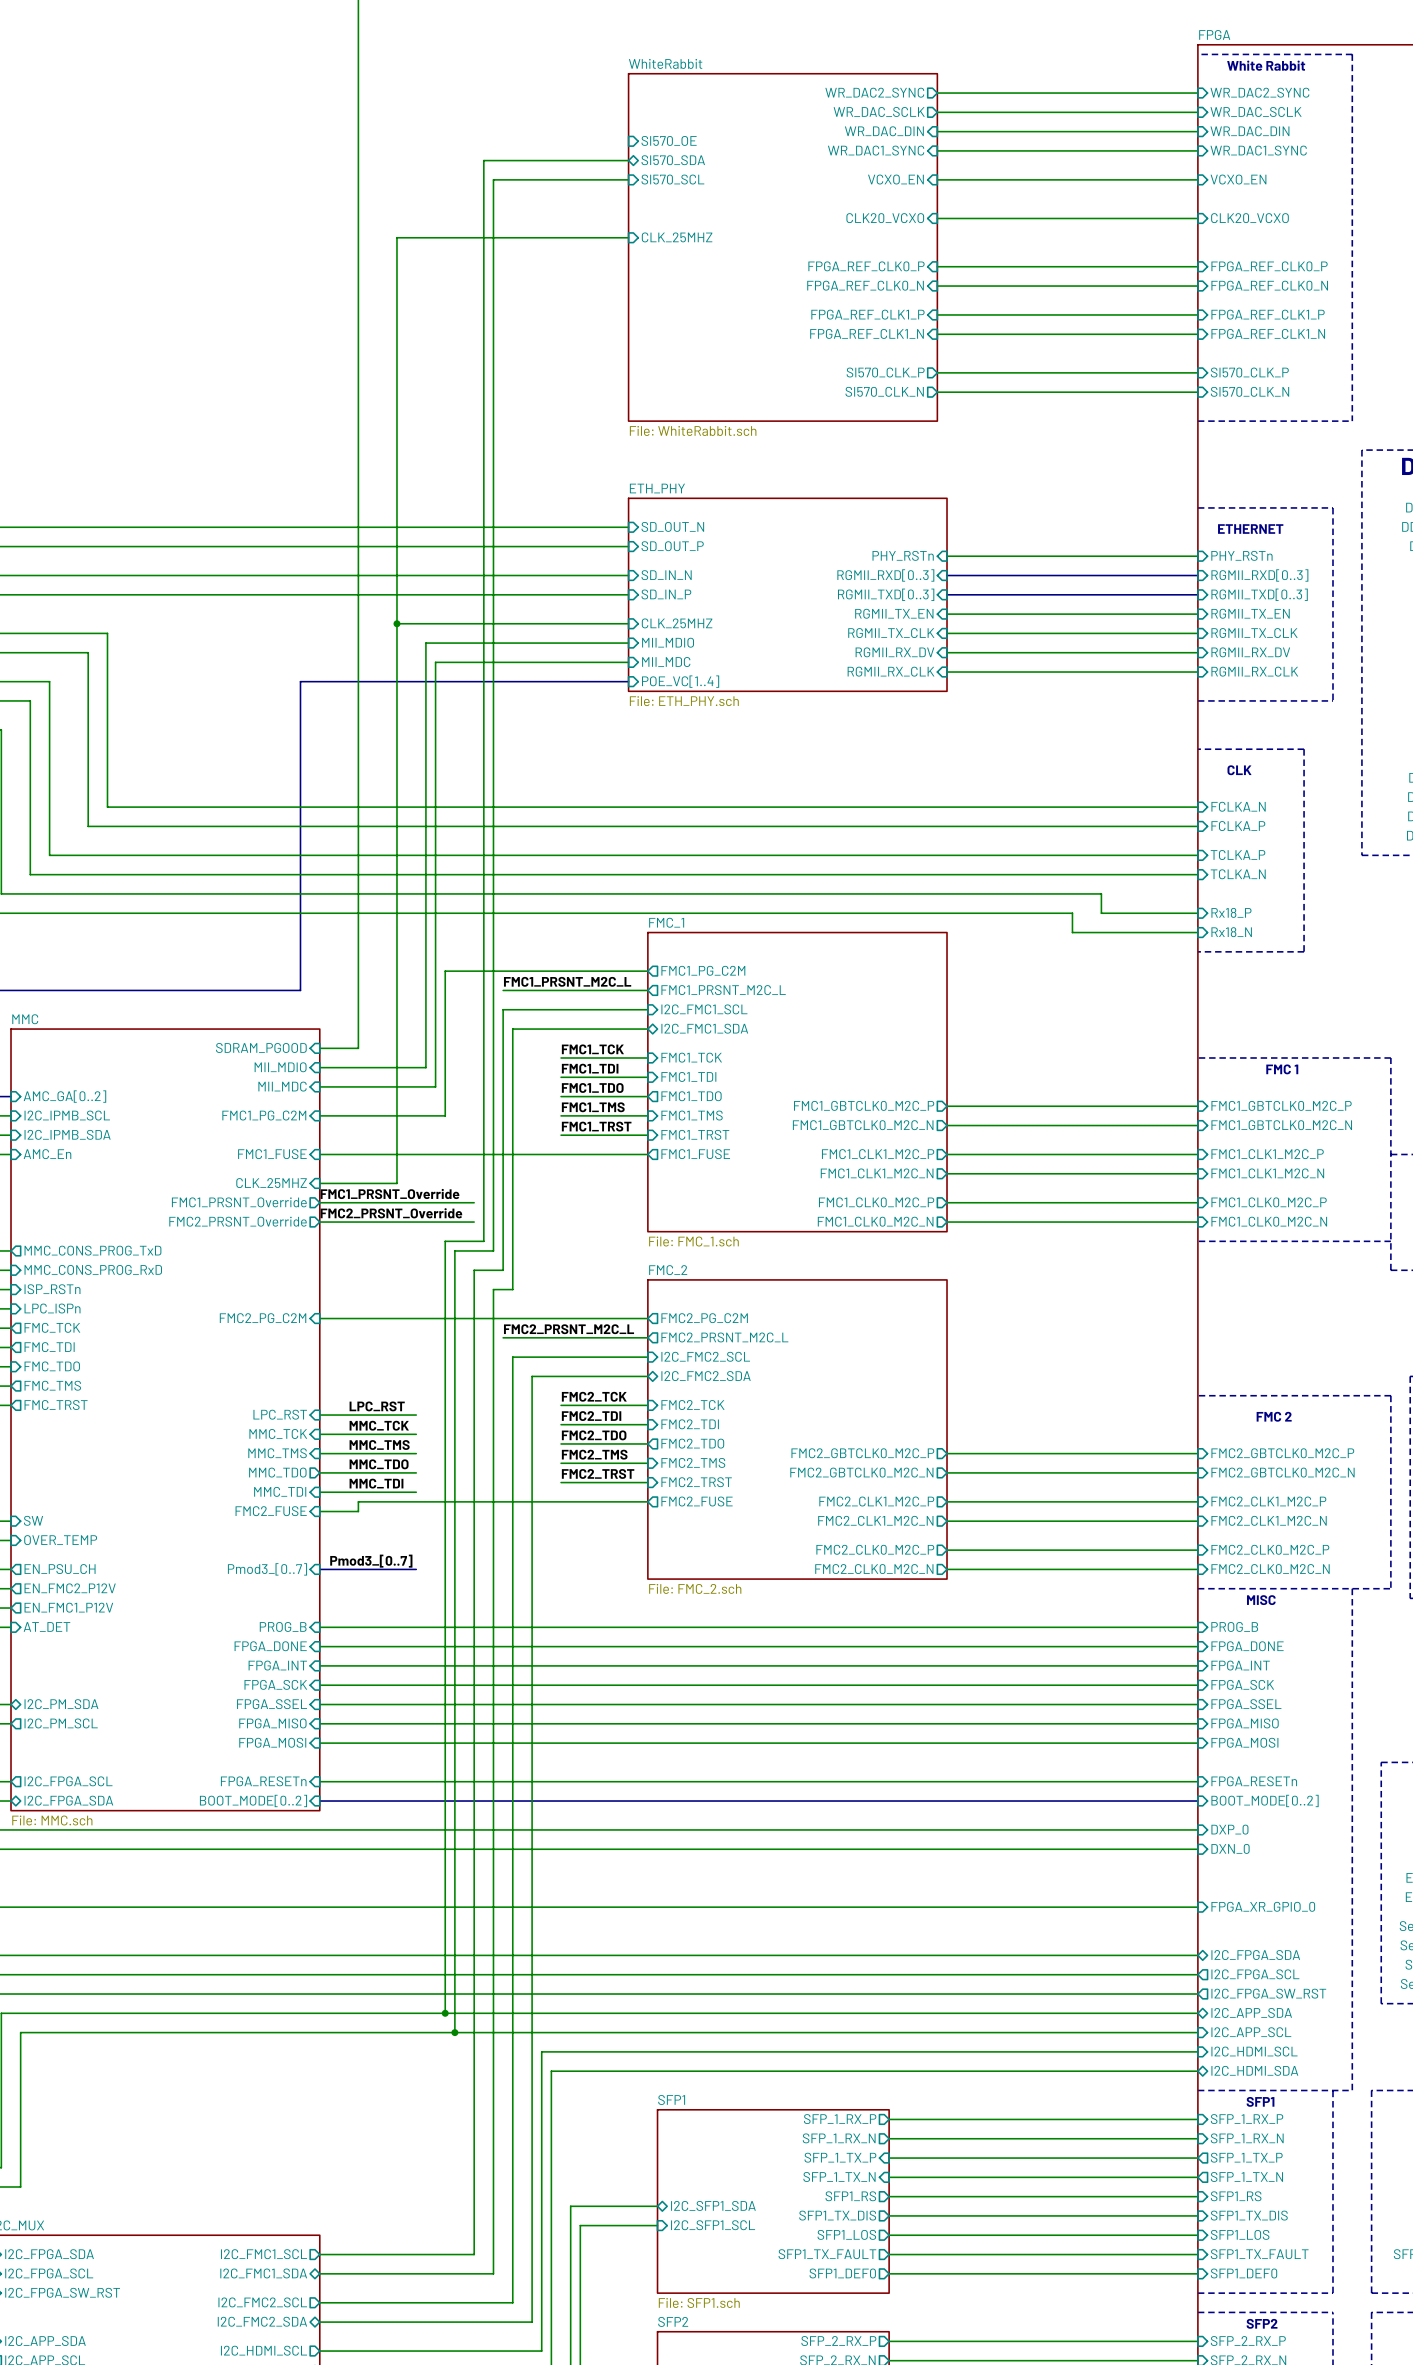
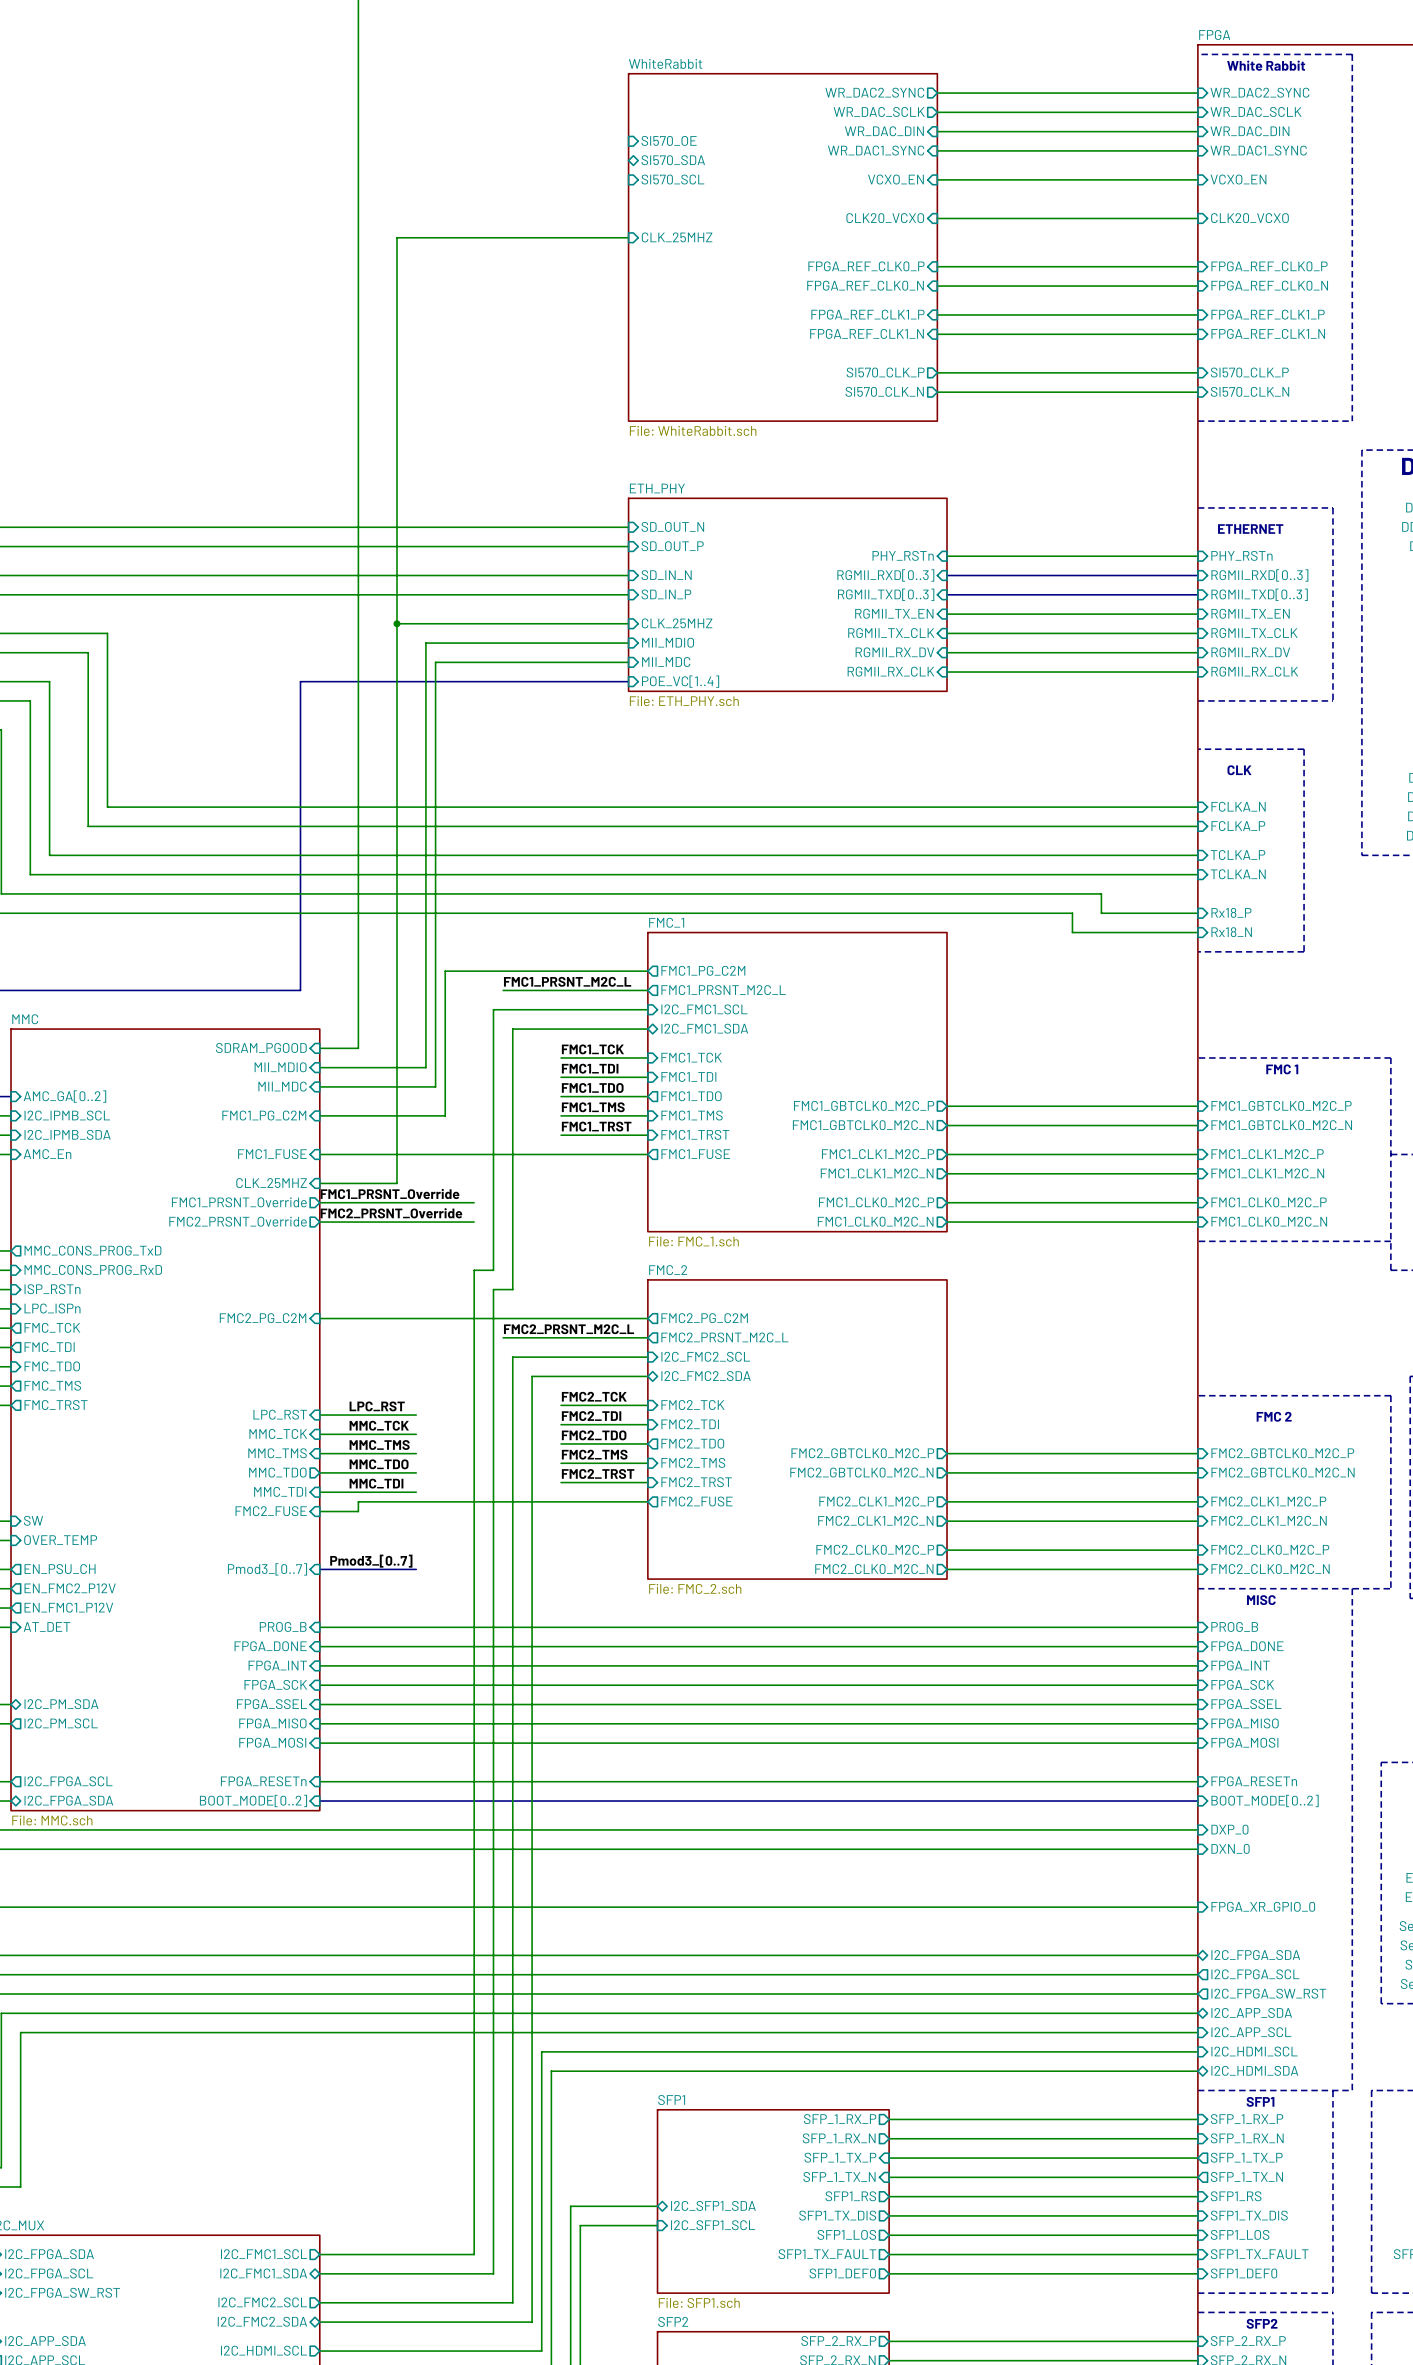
wire: (628, 160) (483, 160) (483, 1241) (445, 1241) (445, 2013) -> none
wire: (628, 179) (493, 179) (493, 1009) -> (503, 1009) (493, 1009)
wire: (503, 1009) (503, 1270) (493, 1270) -> (493, 1250) (493, 1270)
wire: (493, 1250) (454, 1250) (454, 2032) -> none
junction: (445, 2013) -> none
junction: (454, 2032) -> none

